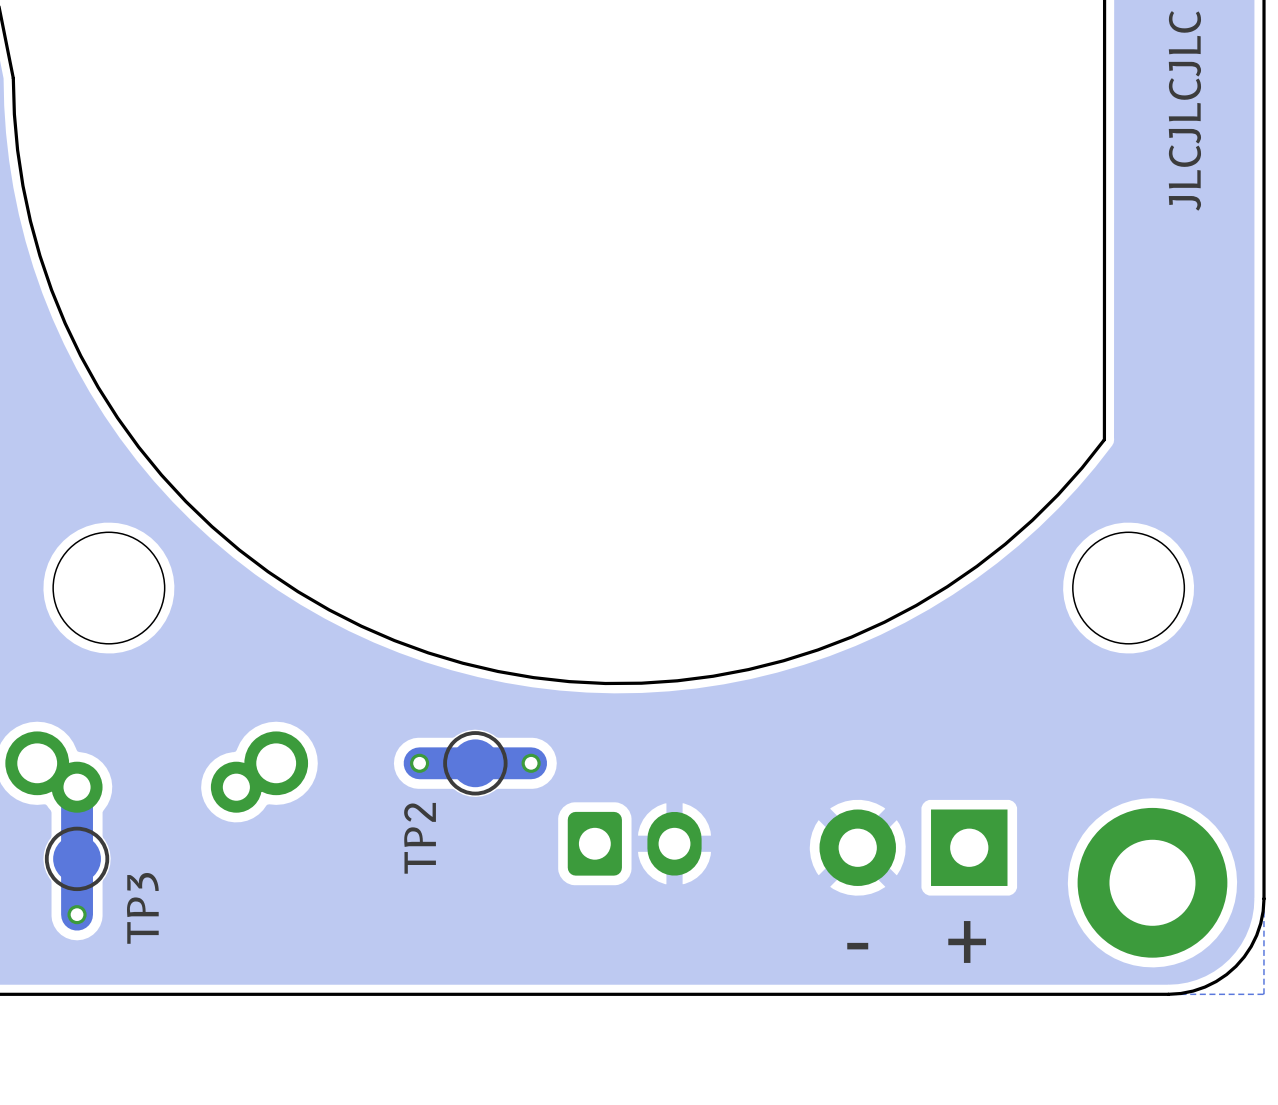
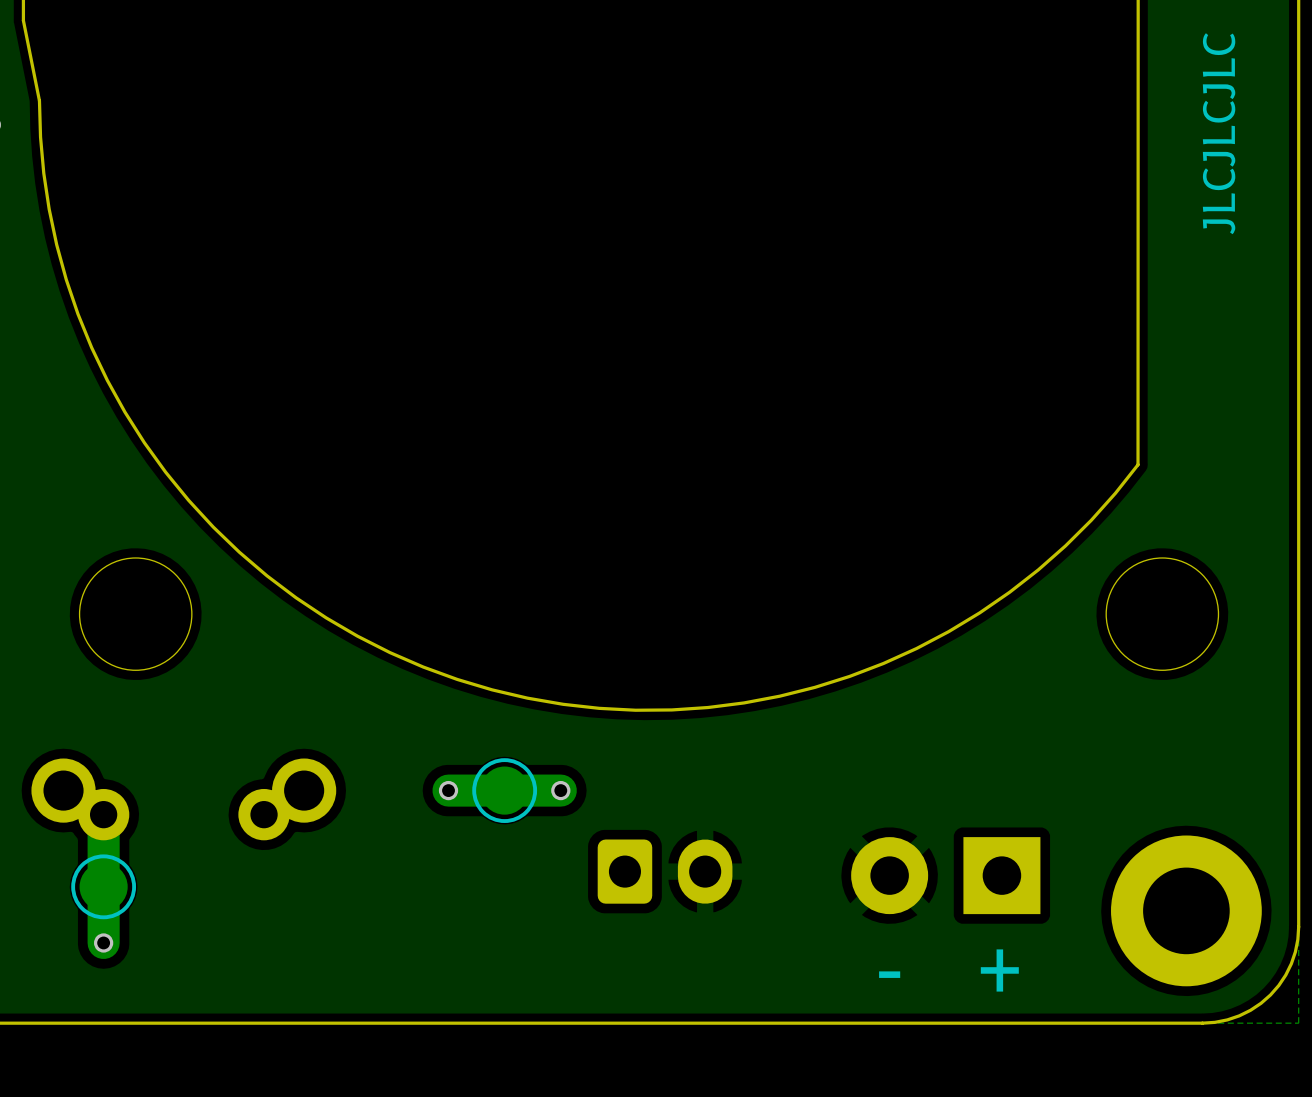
TP2 name: TP2 (420, 838) -> none
TP3 name: TP3 (142, 908) -> none

